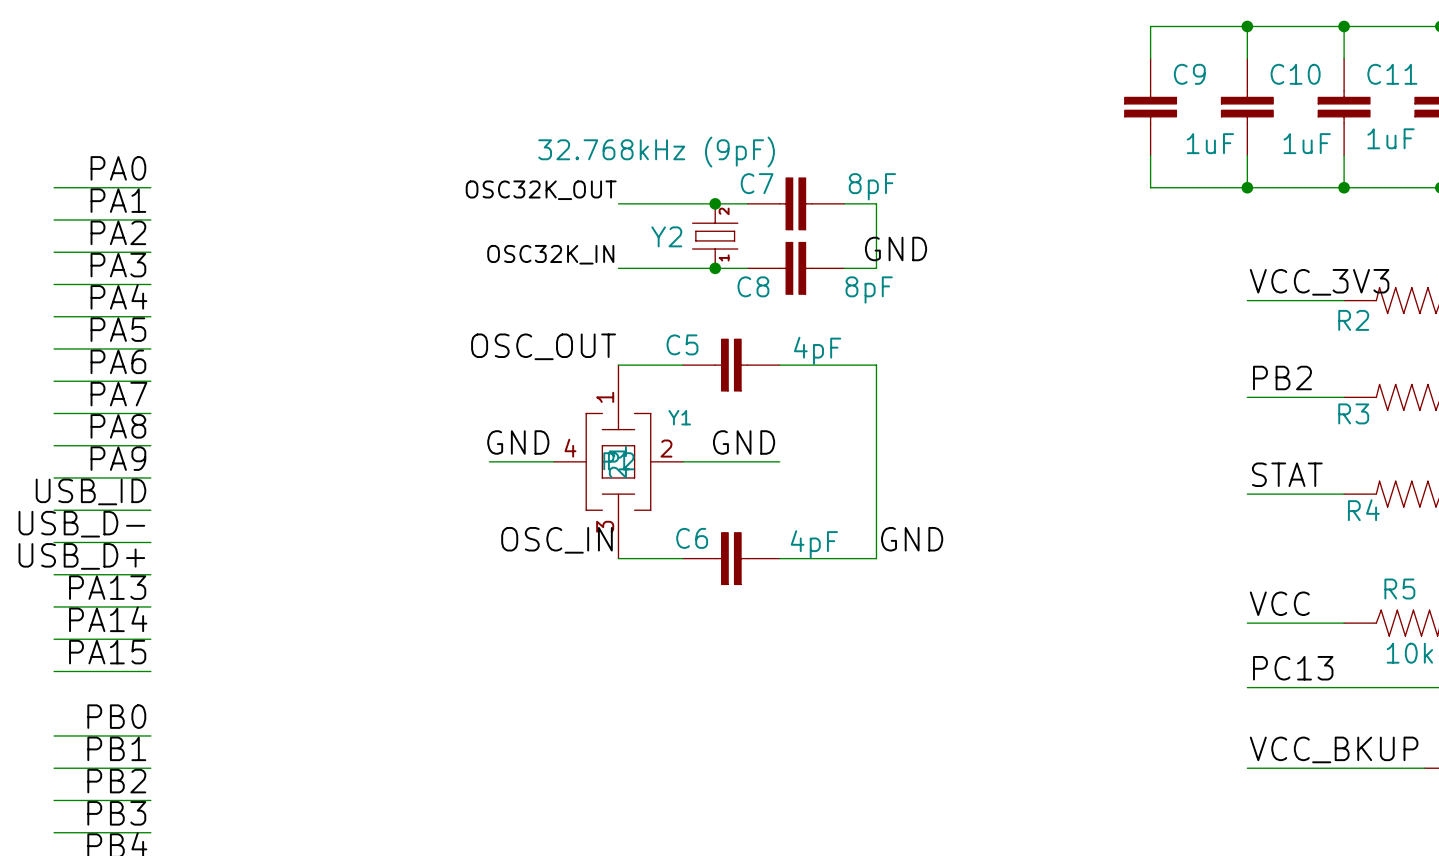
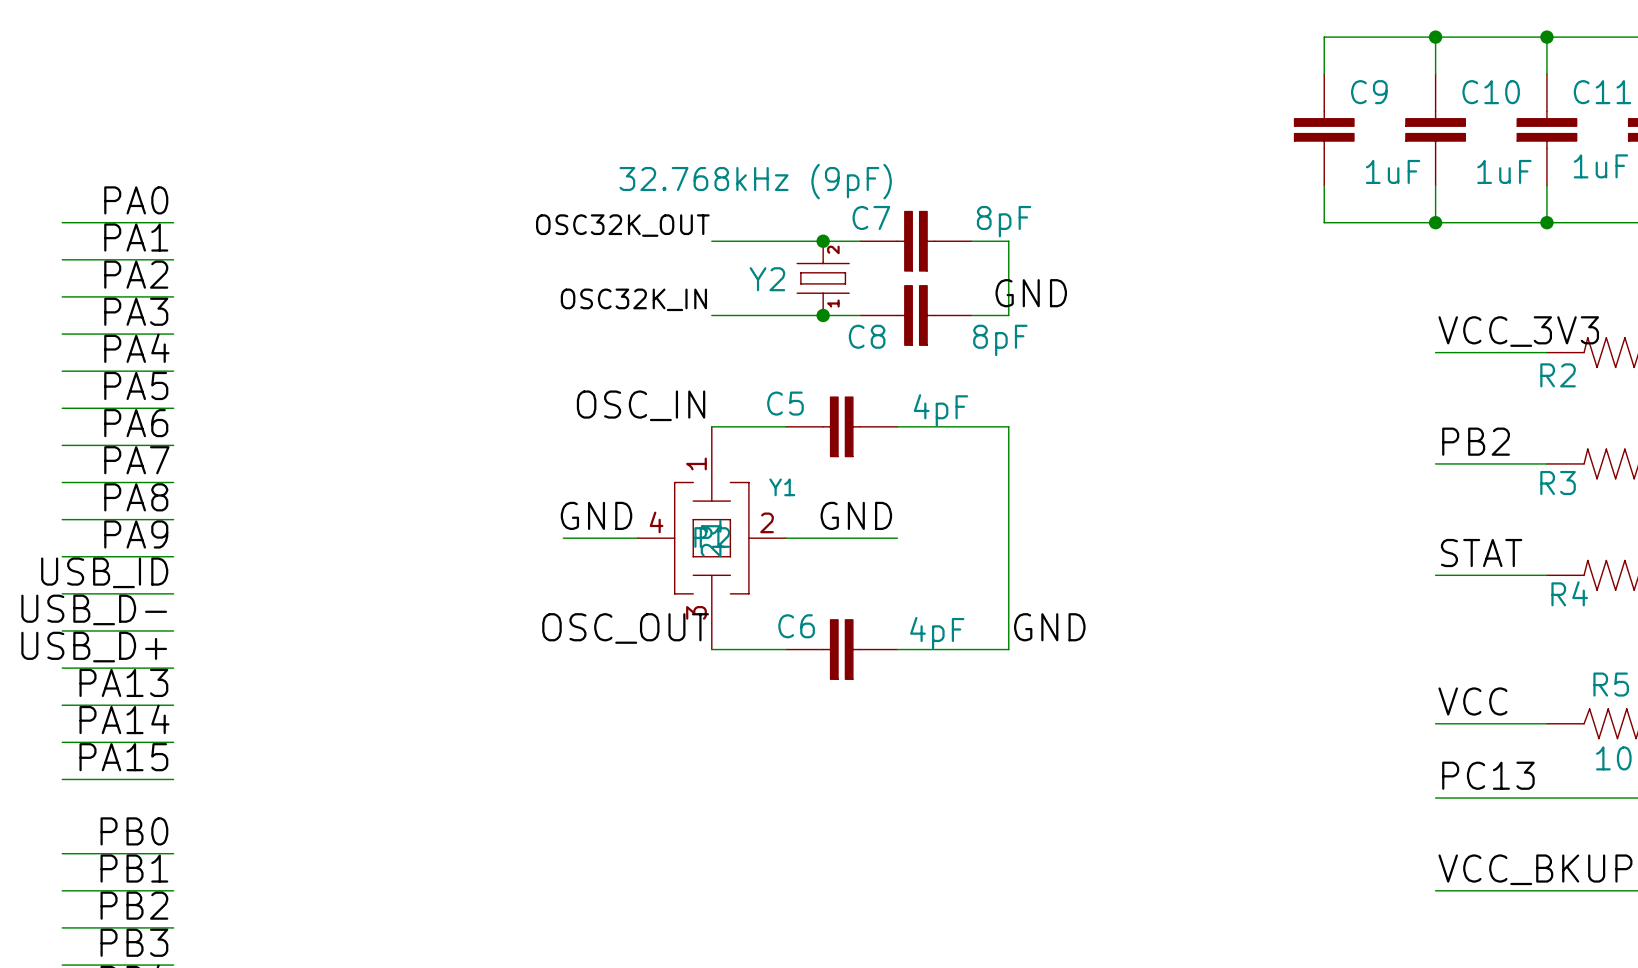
label: OSC_OUT (543, 346) -> OSC_IN (641, 405)
label: OSC_IN (557, 540) -> OSC_OUT (625, 628)

